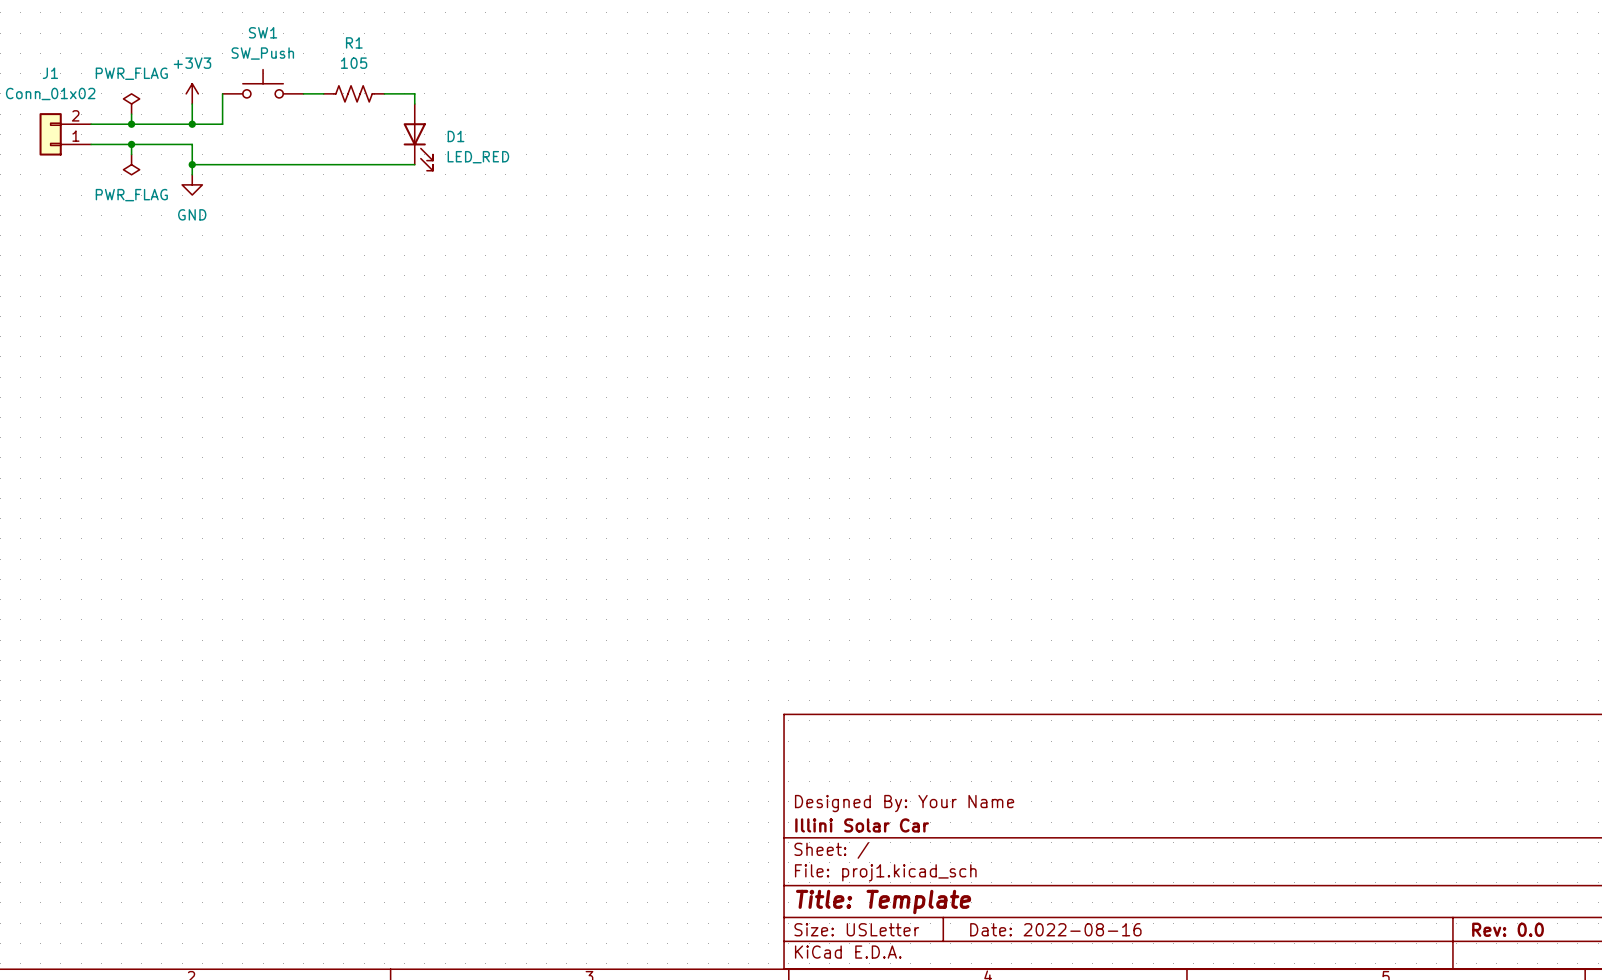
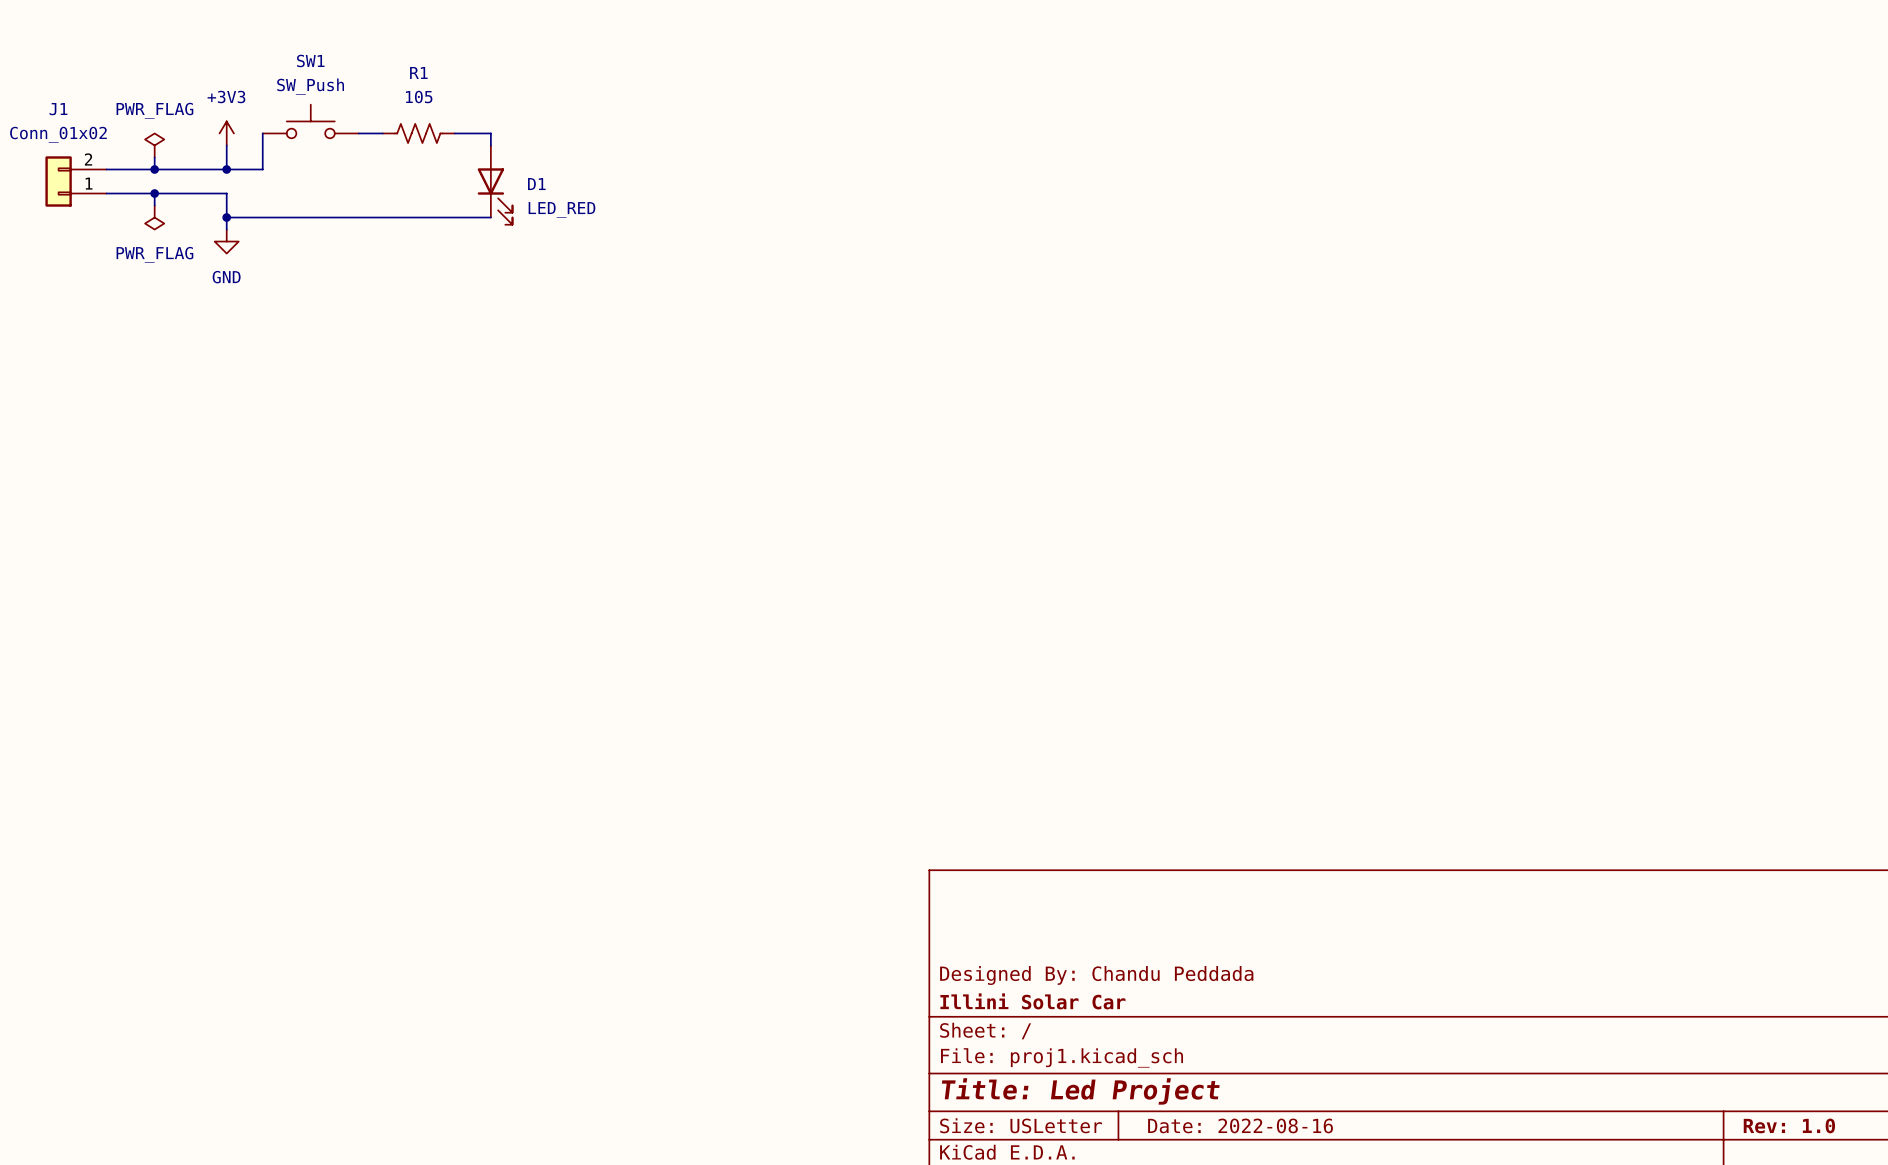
title block: Designed By: Your Name (904, 803) -> Designed By: Chandu Peddada (1096, 975)
title block: Title: Template (883, 902) -> Title: Led Project (1080, 1091)
title block: Rev: 0.0 (1508, 929) -> Rev: 1.0 (1789, 1125)

